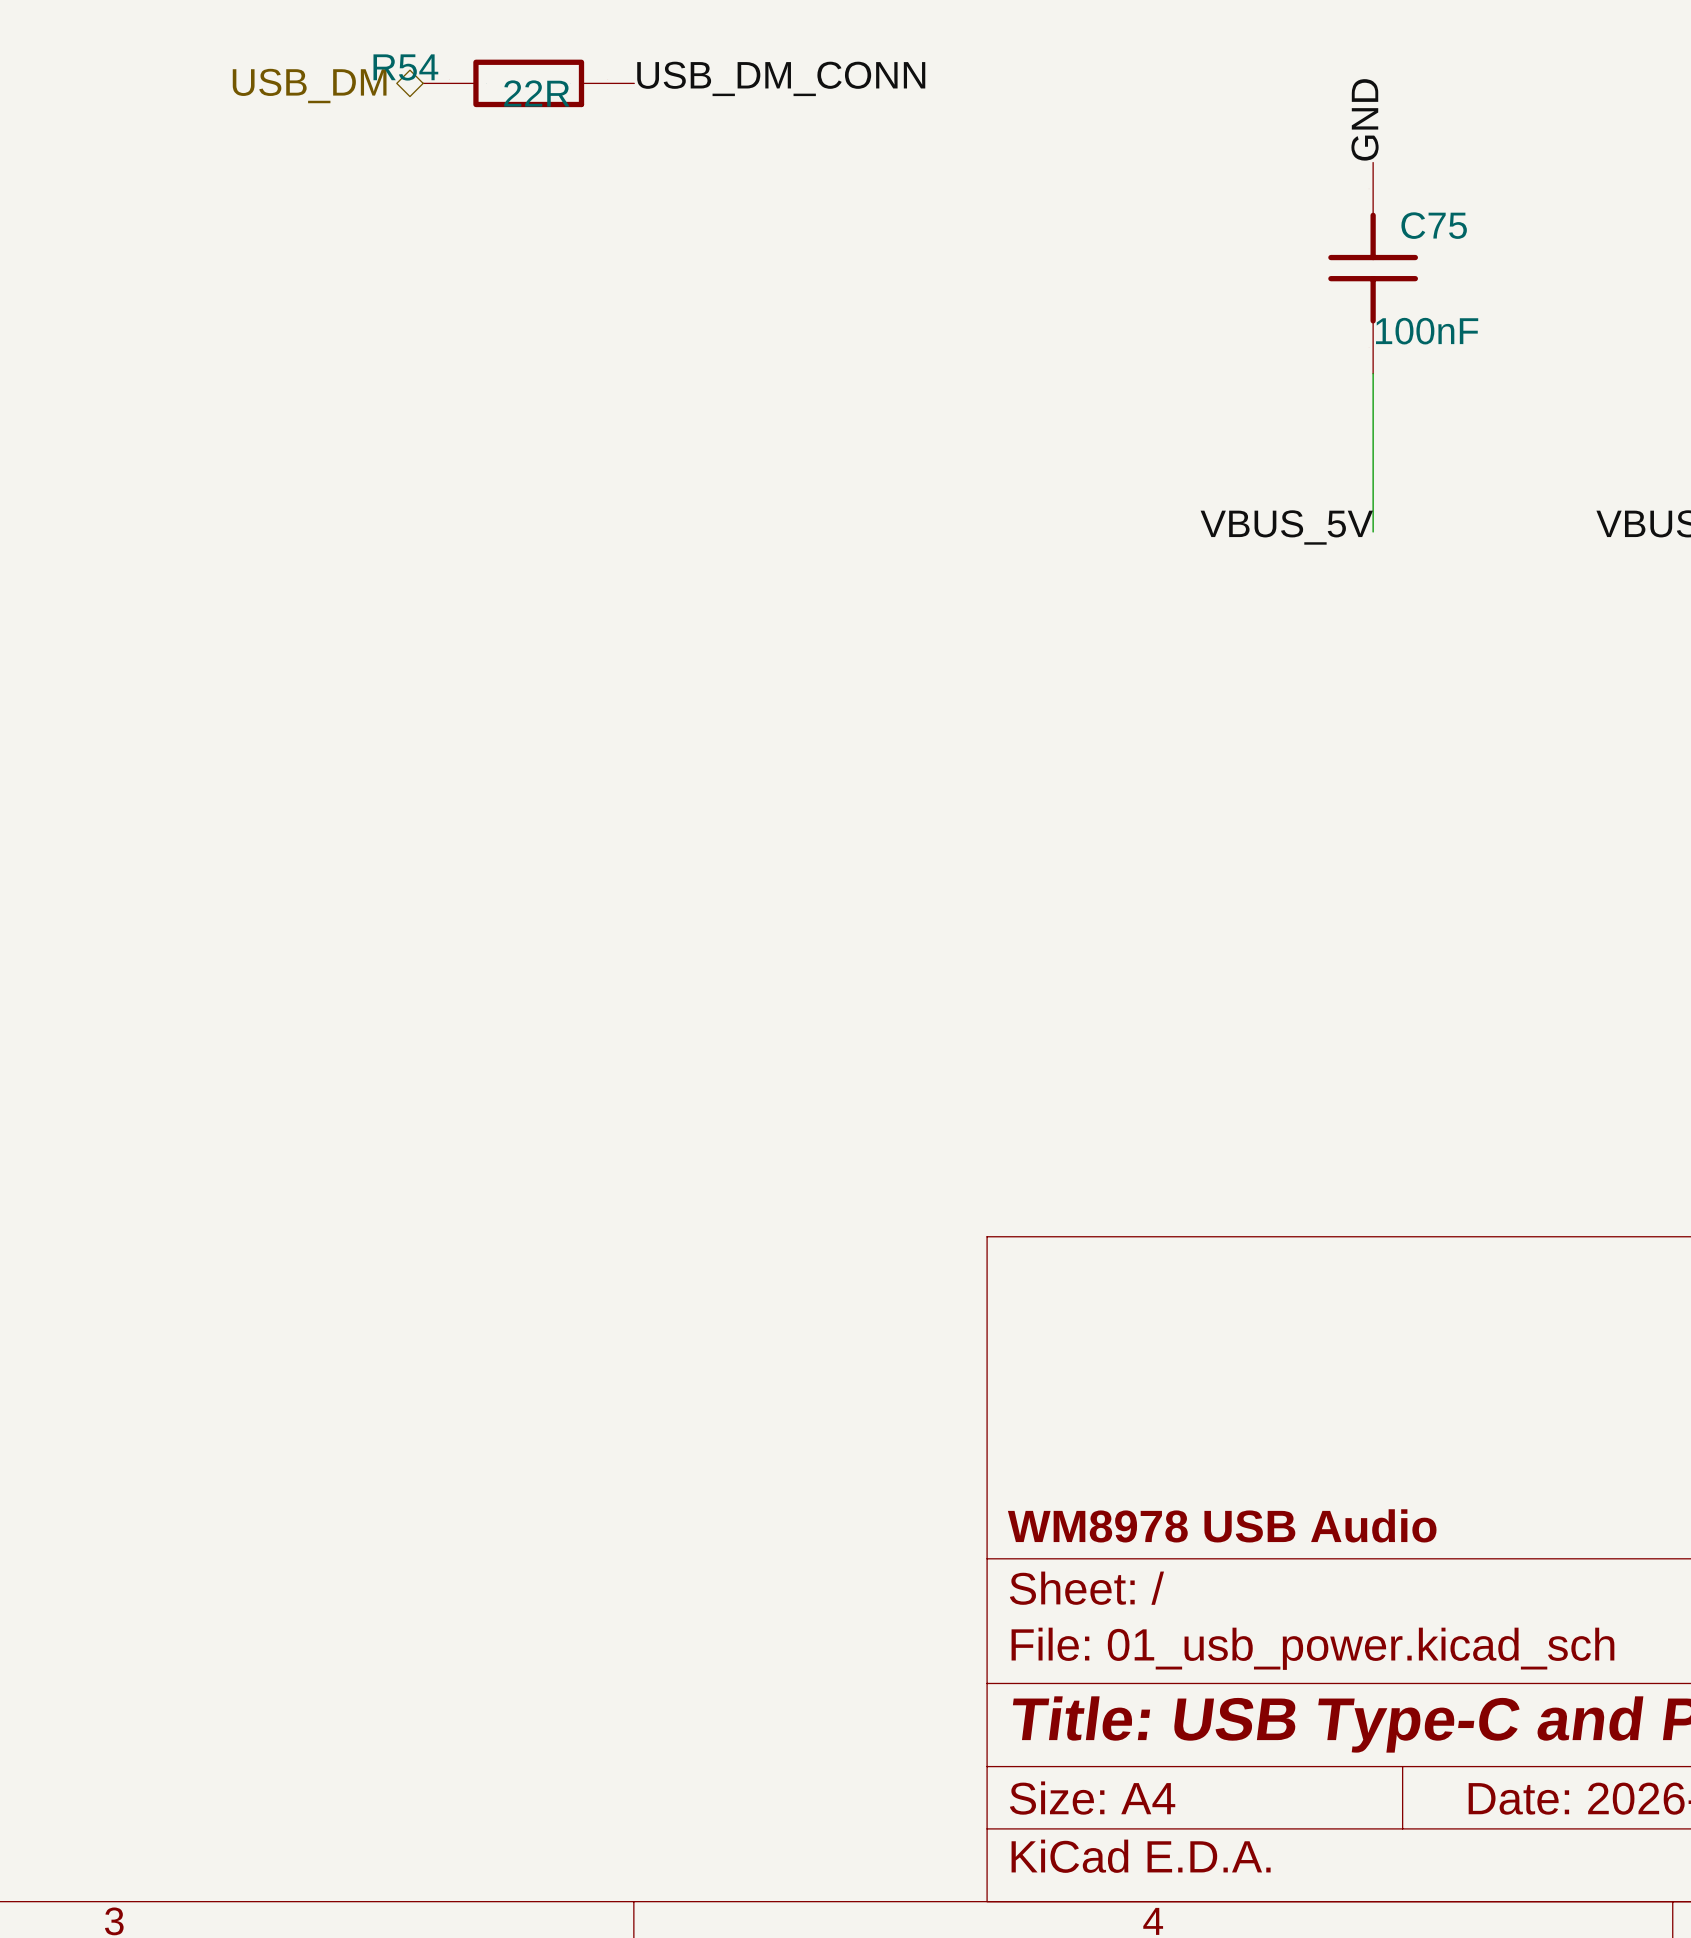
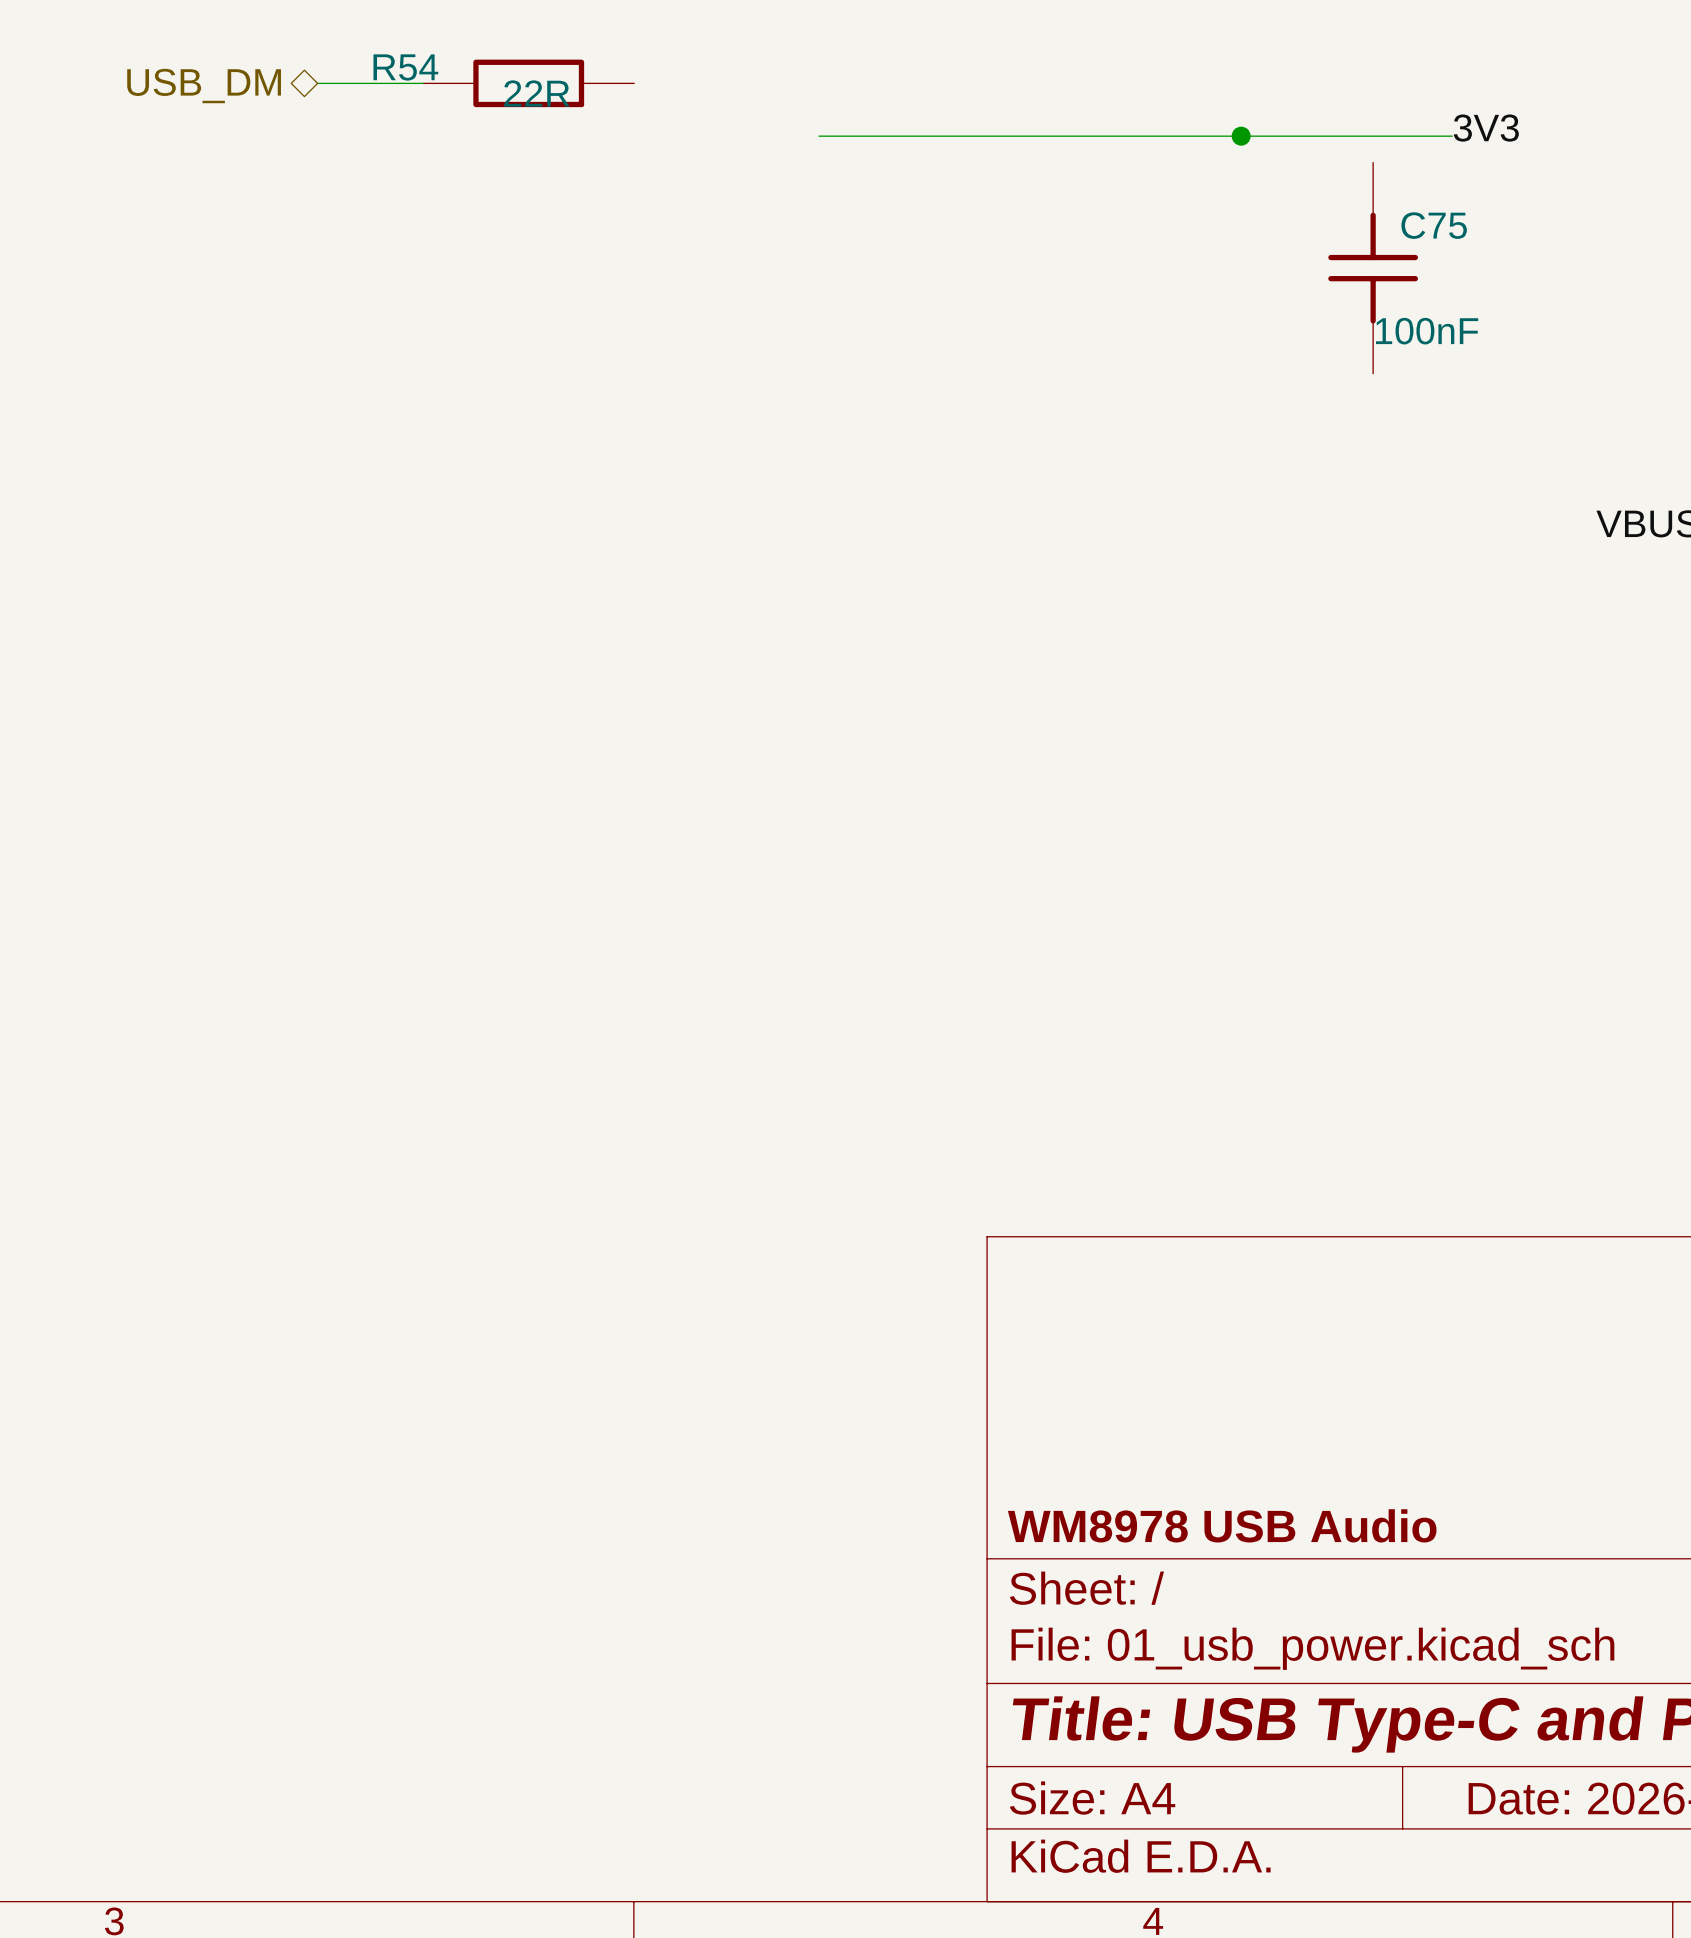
label: USB_DM_CONN (781, 78) -> none
wire: none -> (317, 83) (423, 83)
hierarchical label position: USB_DM (309, 86) -> USB_DM (204, 86)
label: GND (1365, 119) -> none
label: none -> 3V3 (1486, 128)
wire: none -> (818, 136) (1452, 136)
junction: none -> (1241, 136)
wire: (1373, 373) (1373, 531) -> none
label: VBUS_5V (1286, 527) -> none

